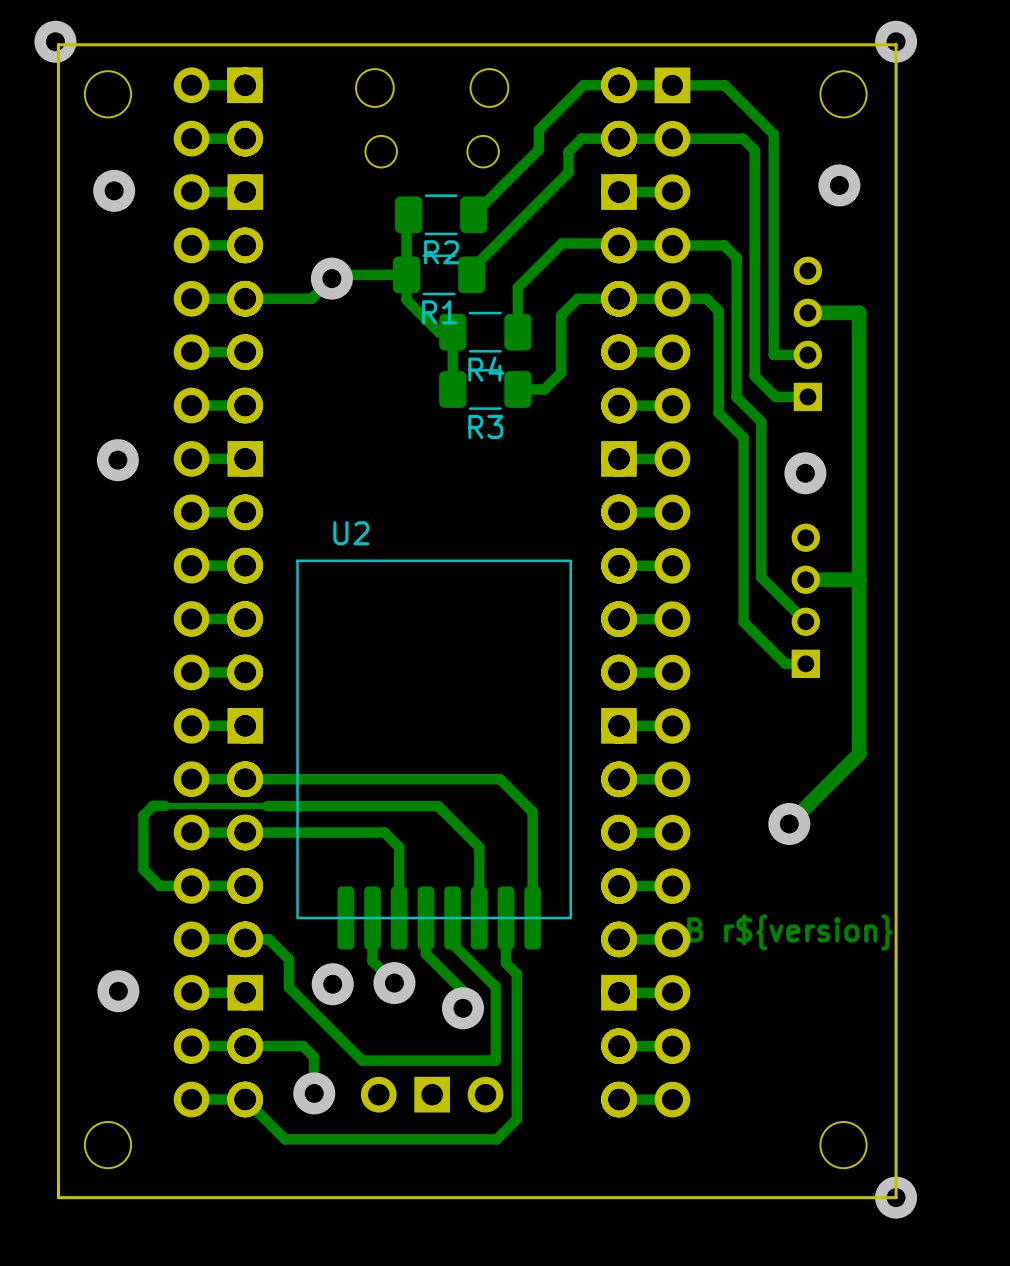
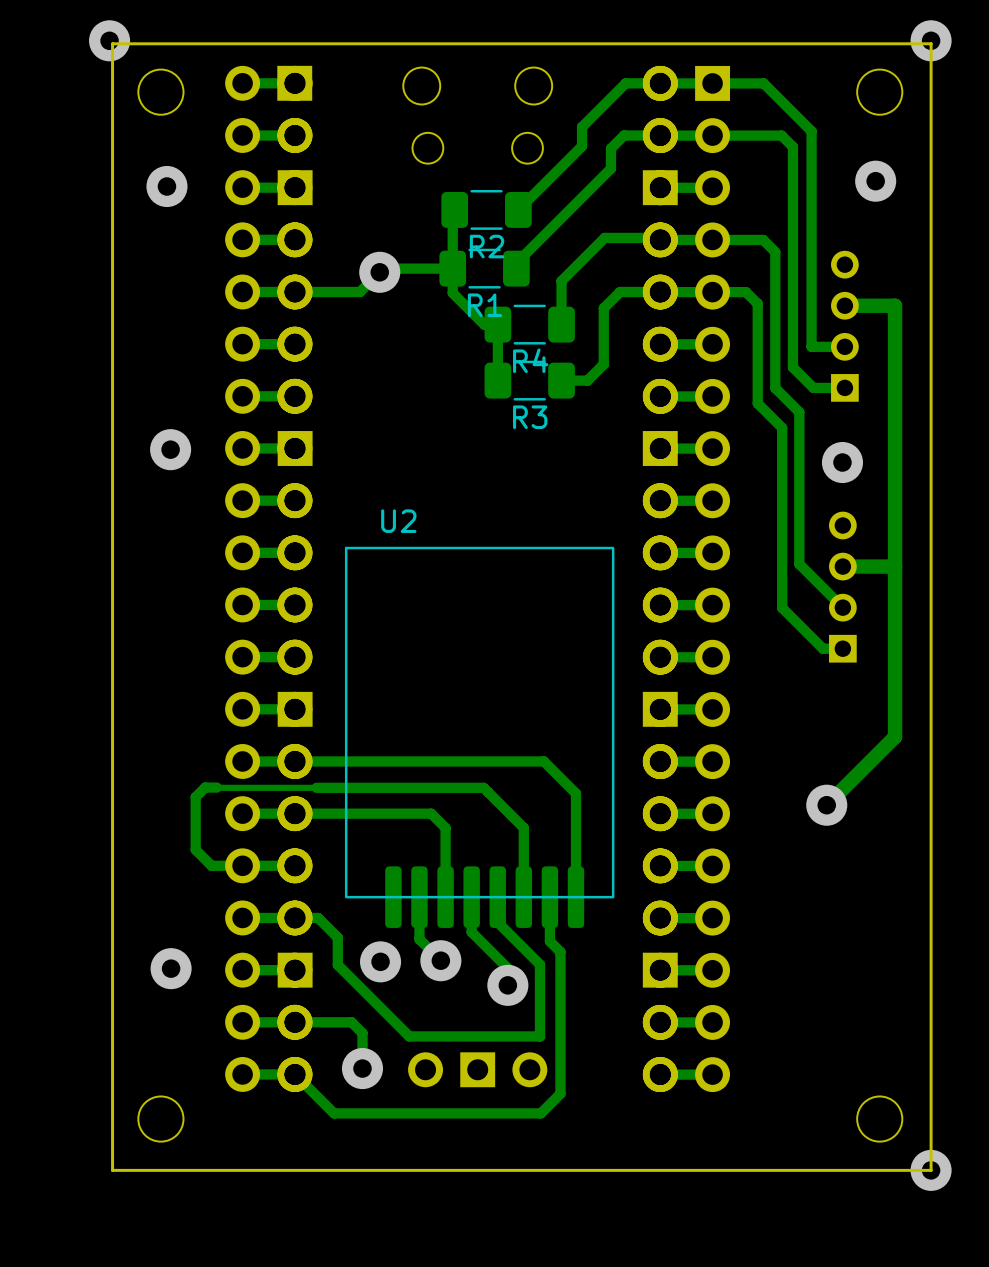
text: B r${version} (789, 932) -> none

